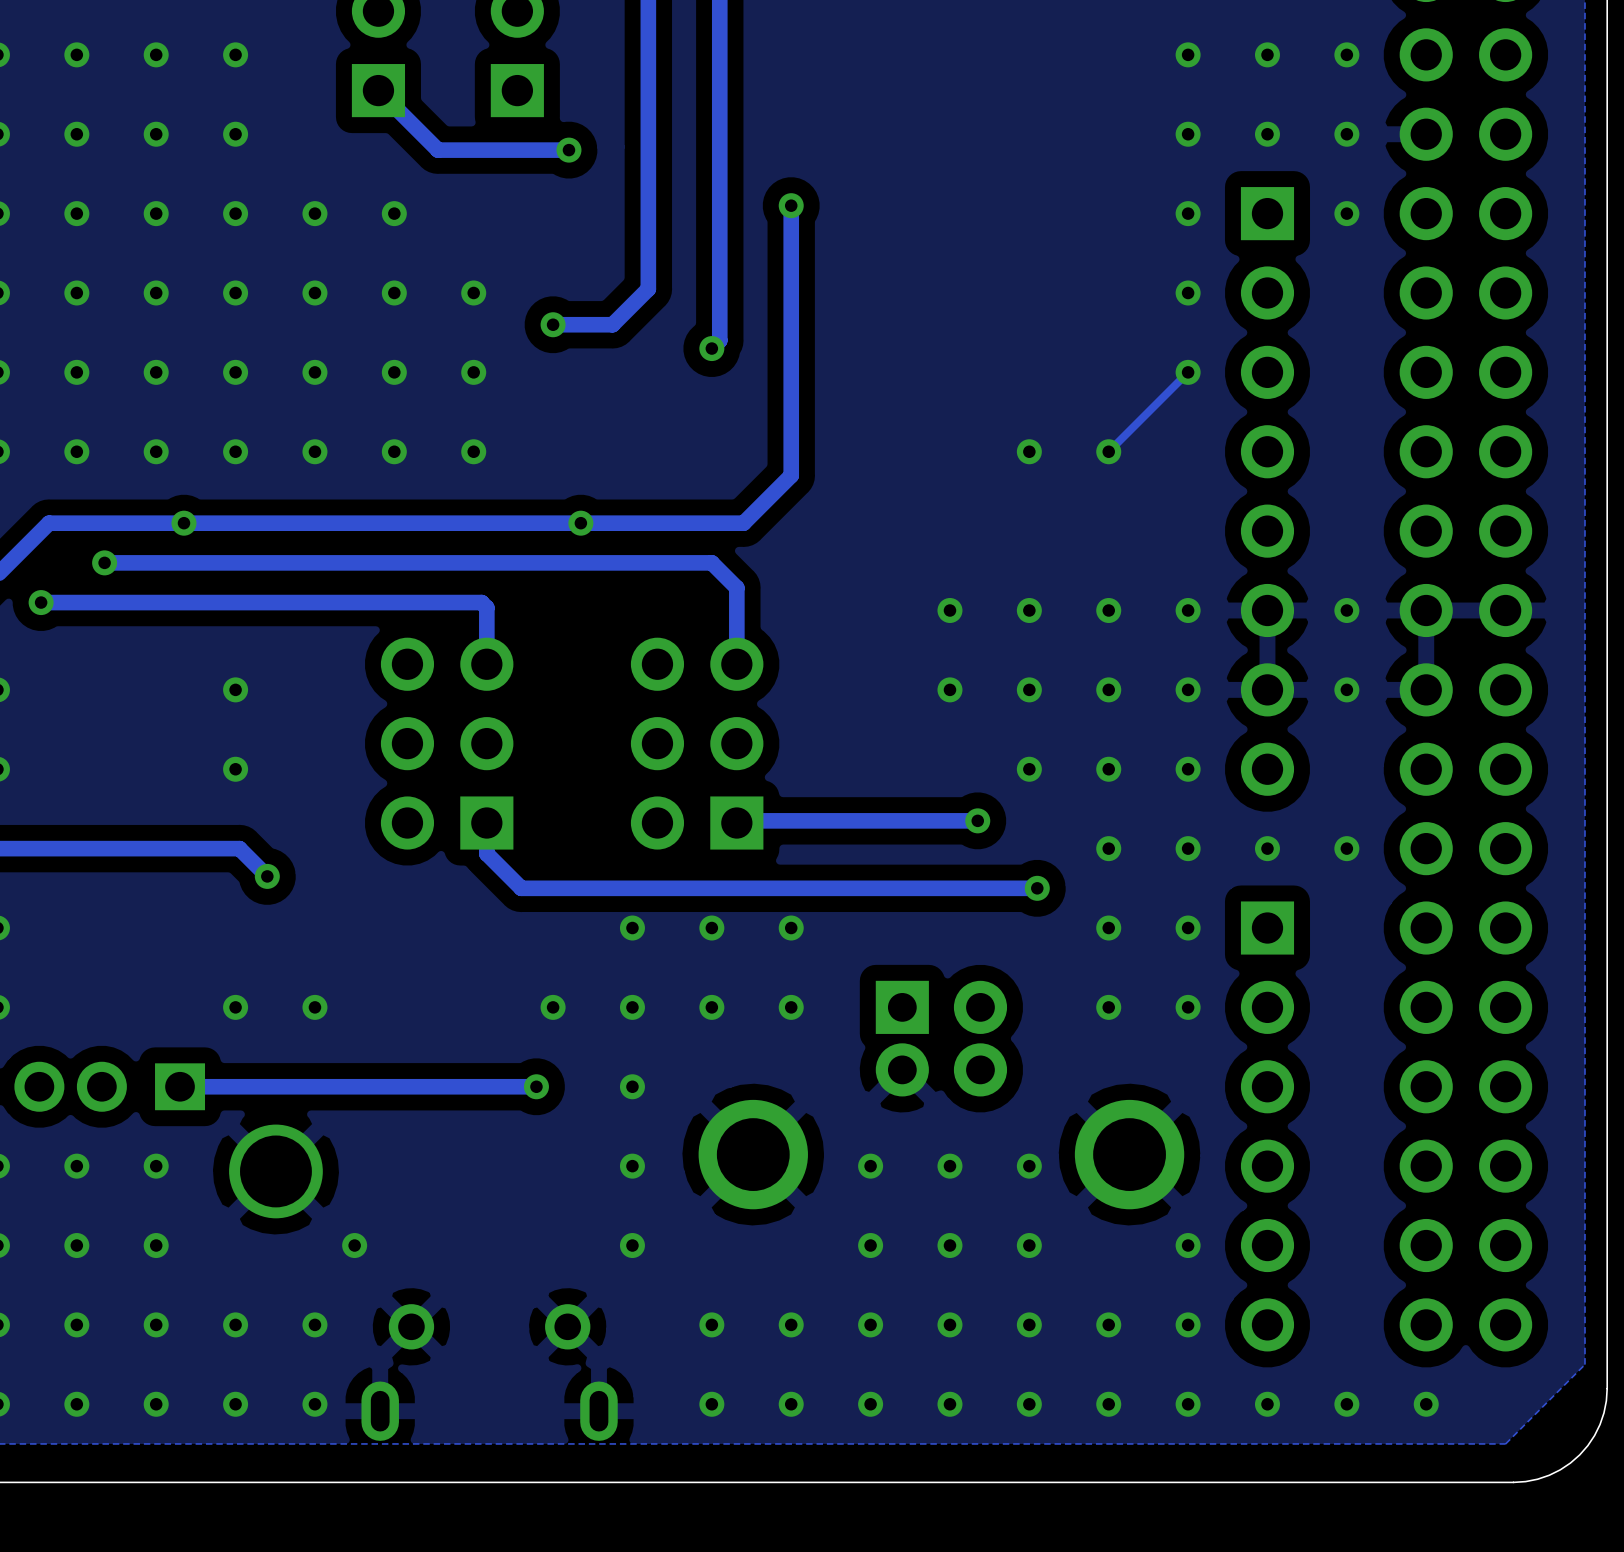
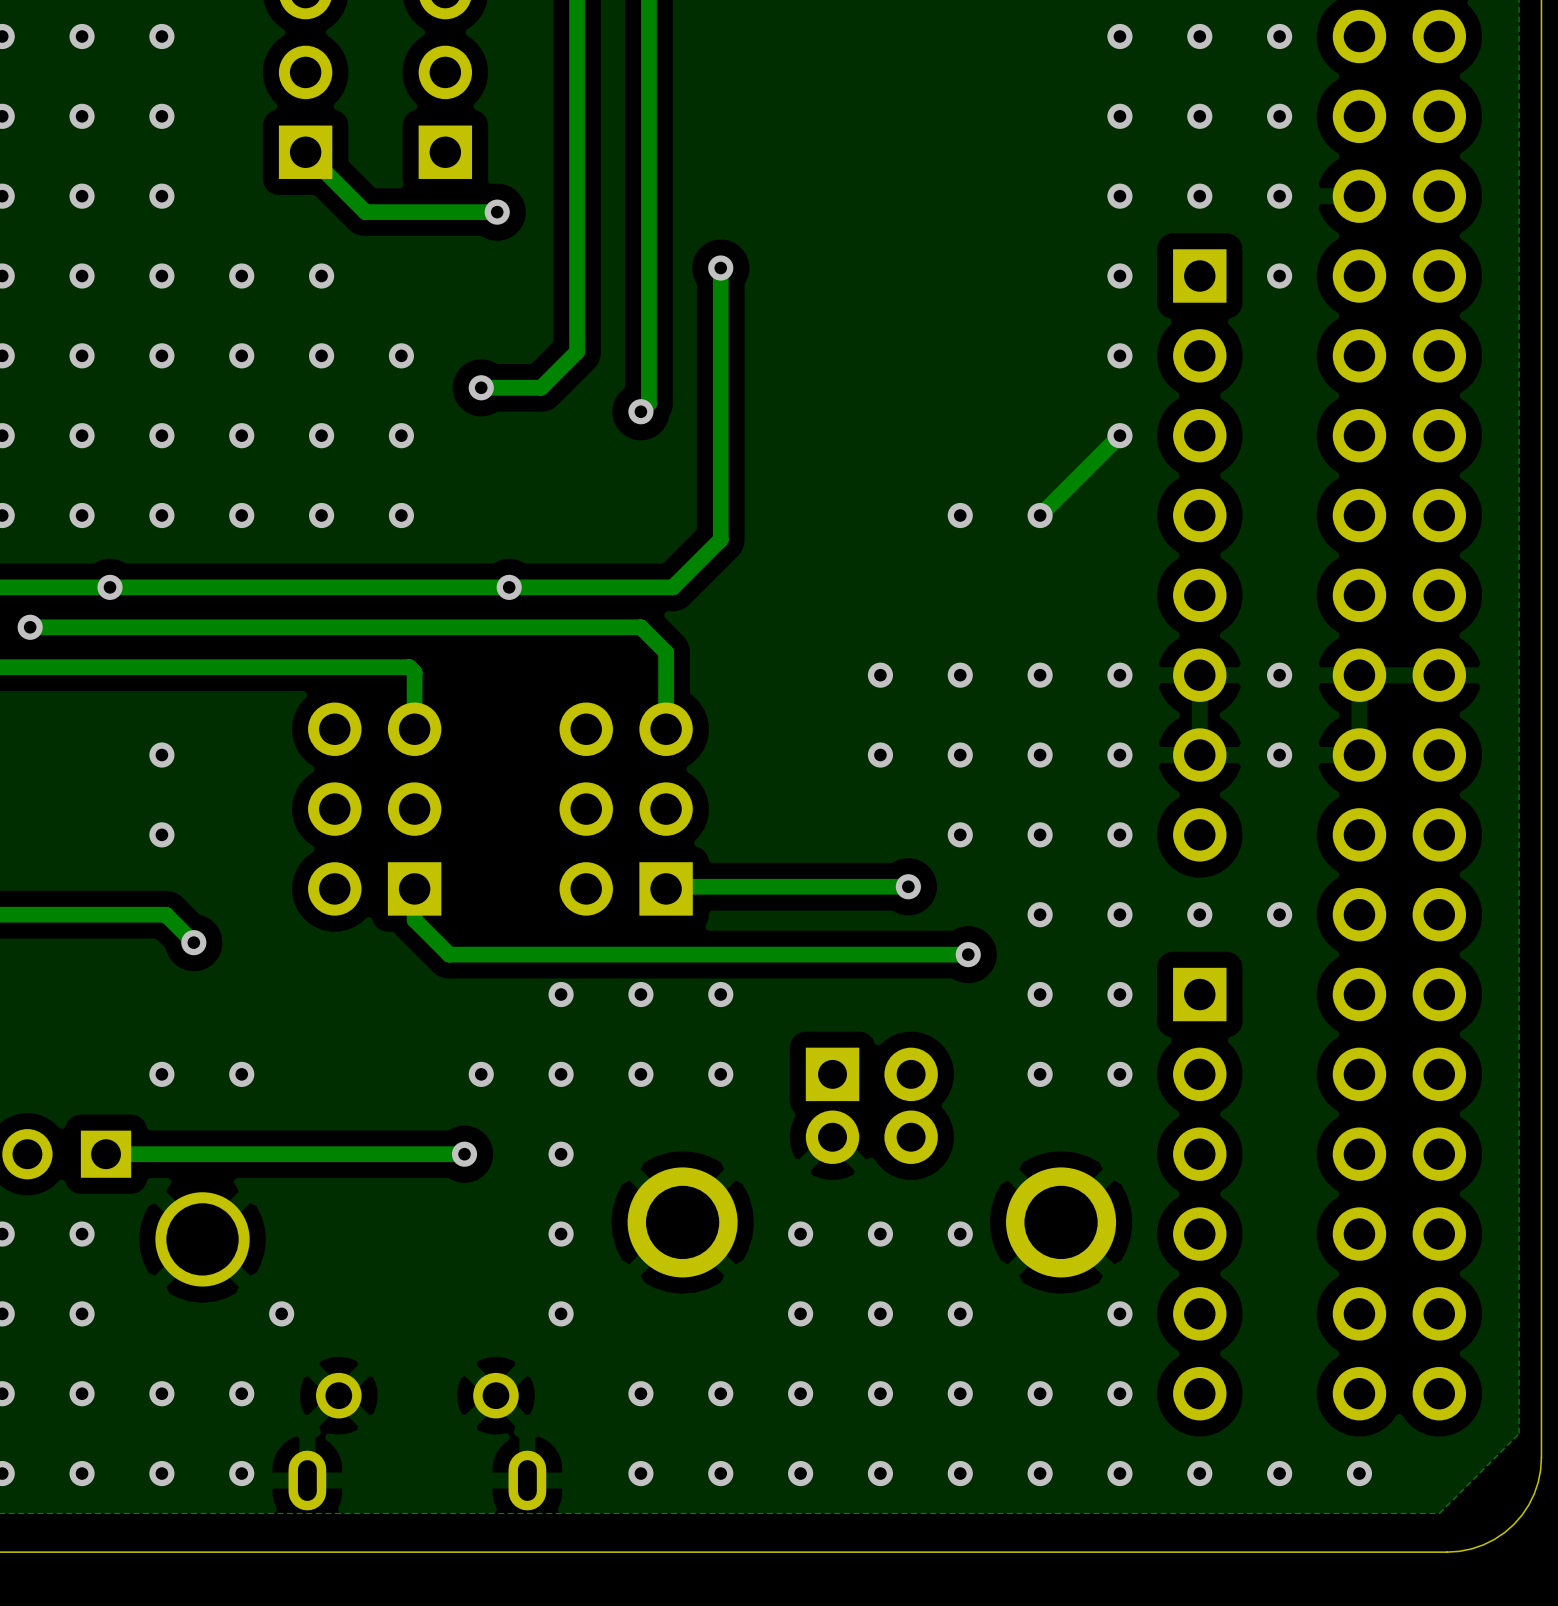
track width: thin (1188, 372) (1108, 451) -> thick (1119, 435) (1040, 515)

